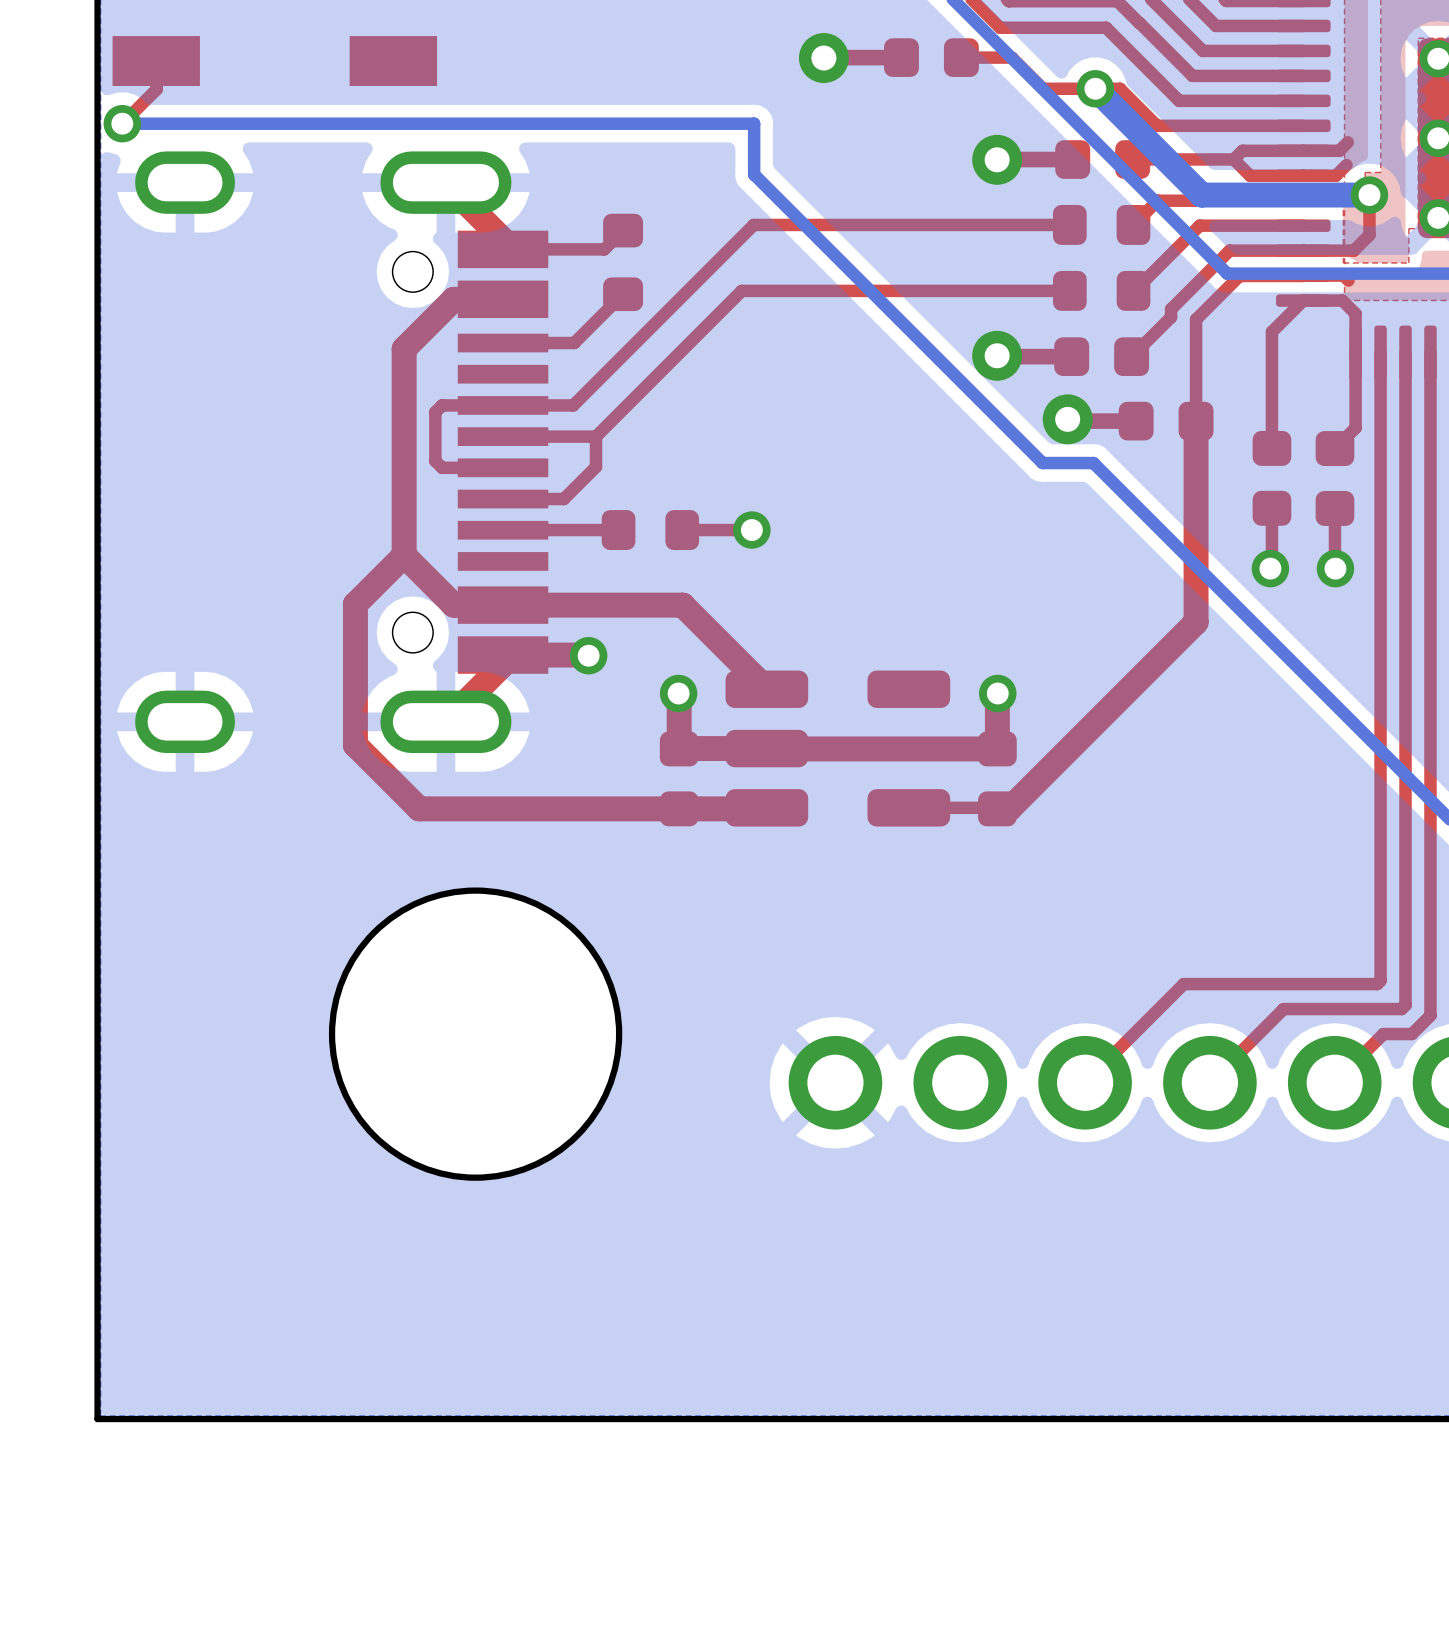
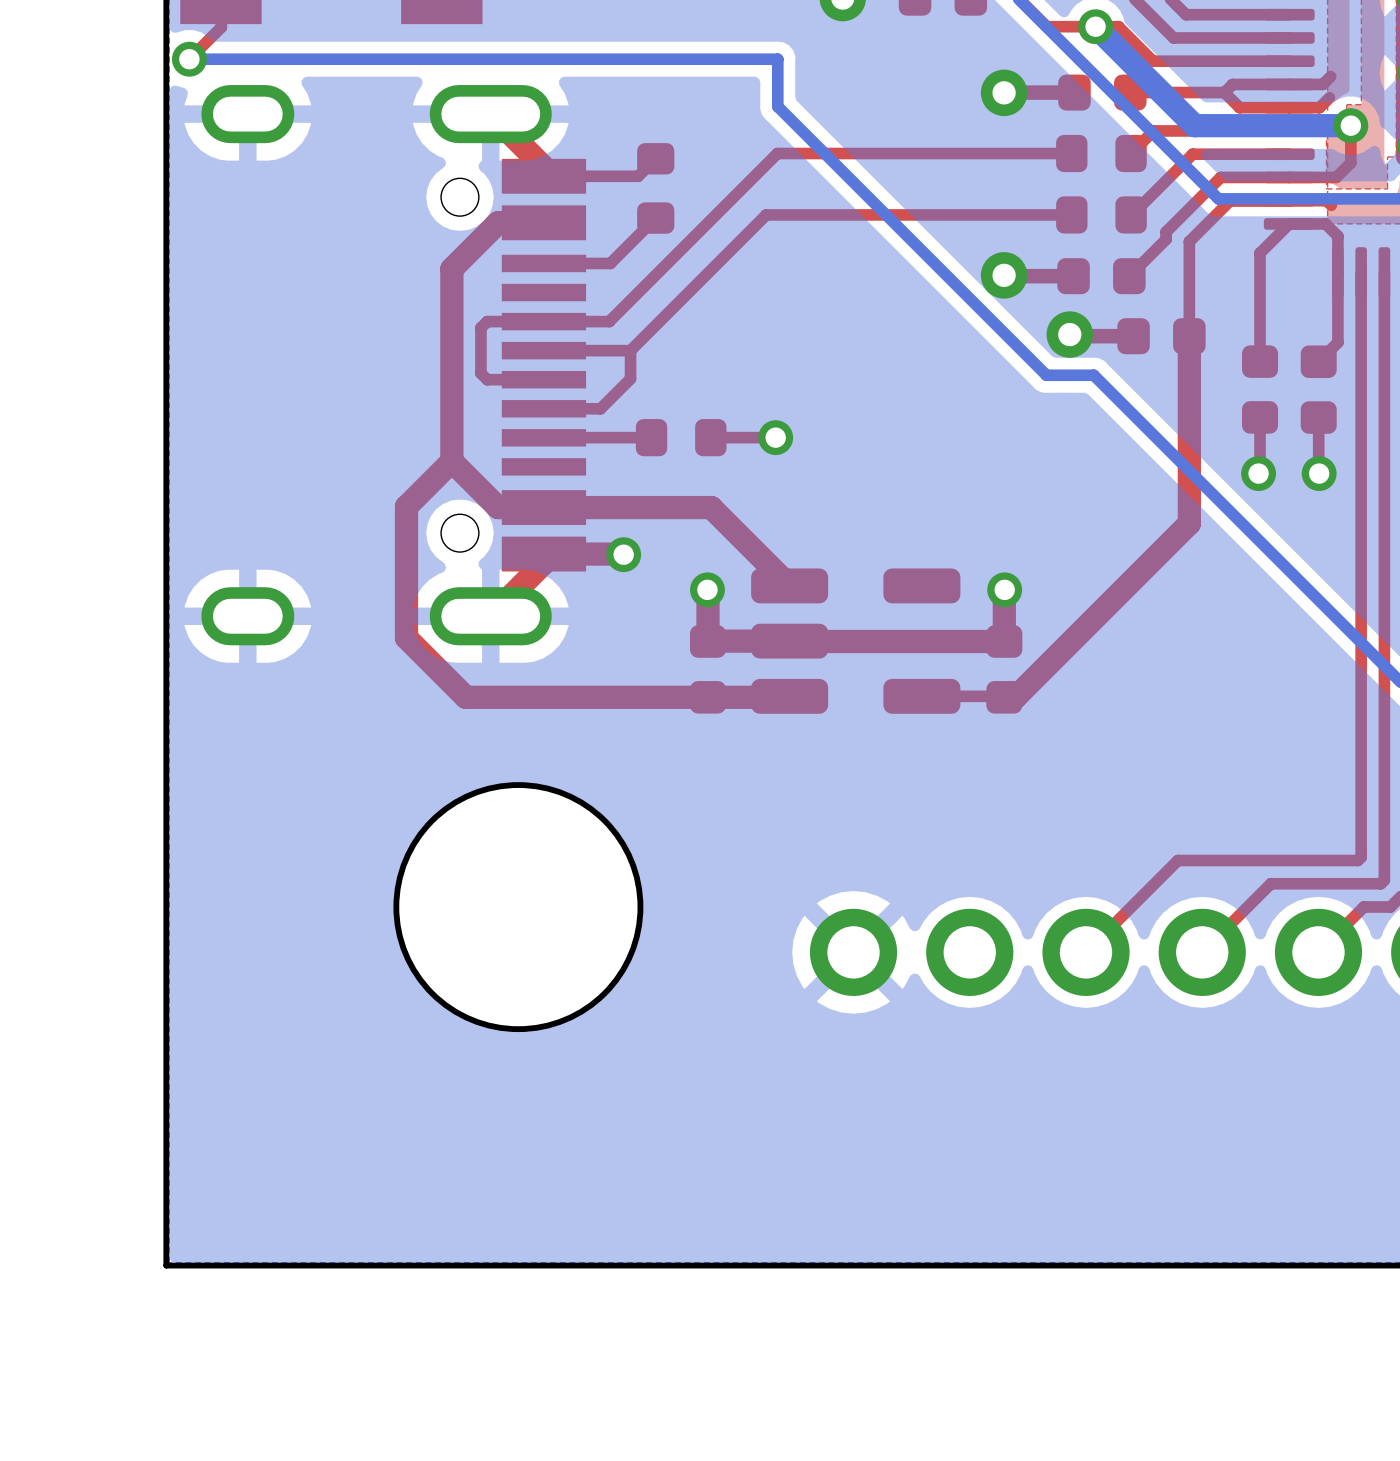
round board edge size: [328, 887, 623, 1181] -> [393, 782, 644, 1033]

